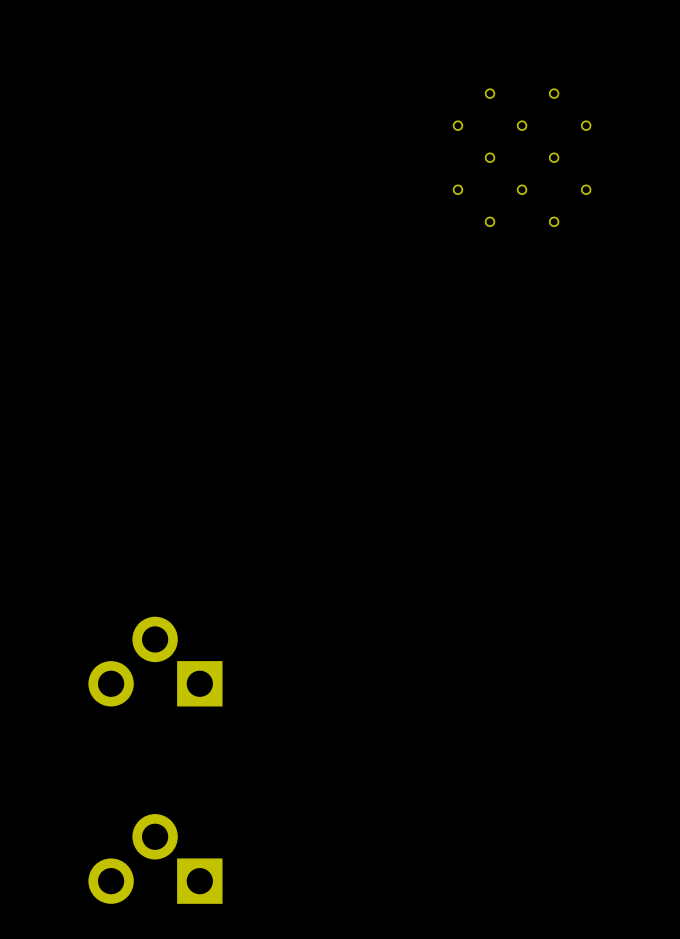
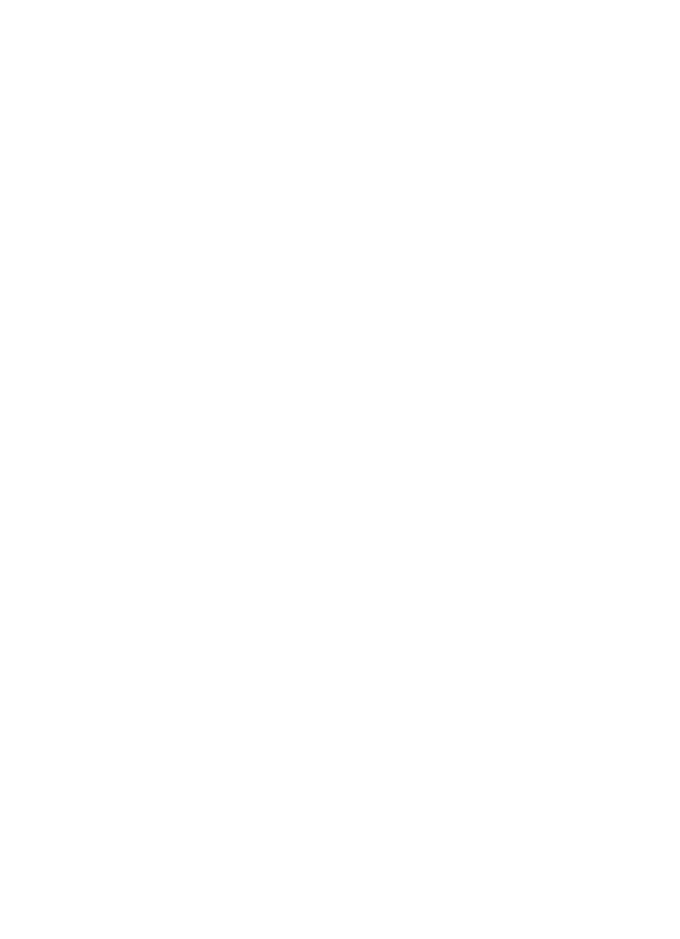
part: (522, 157) -> none
part: (155, 661) -> none
part: (155, 858) -> none

